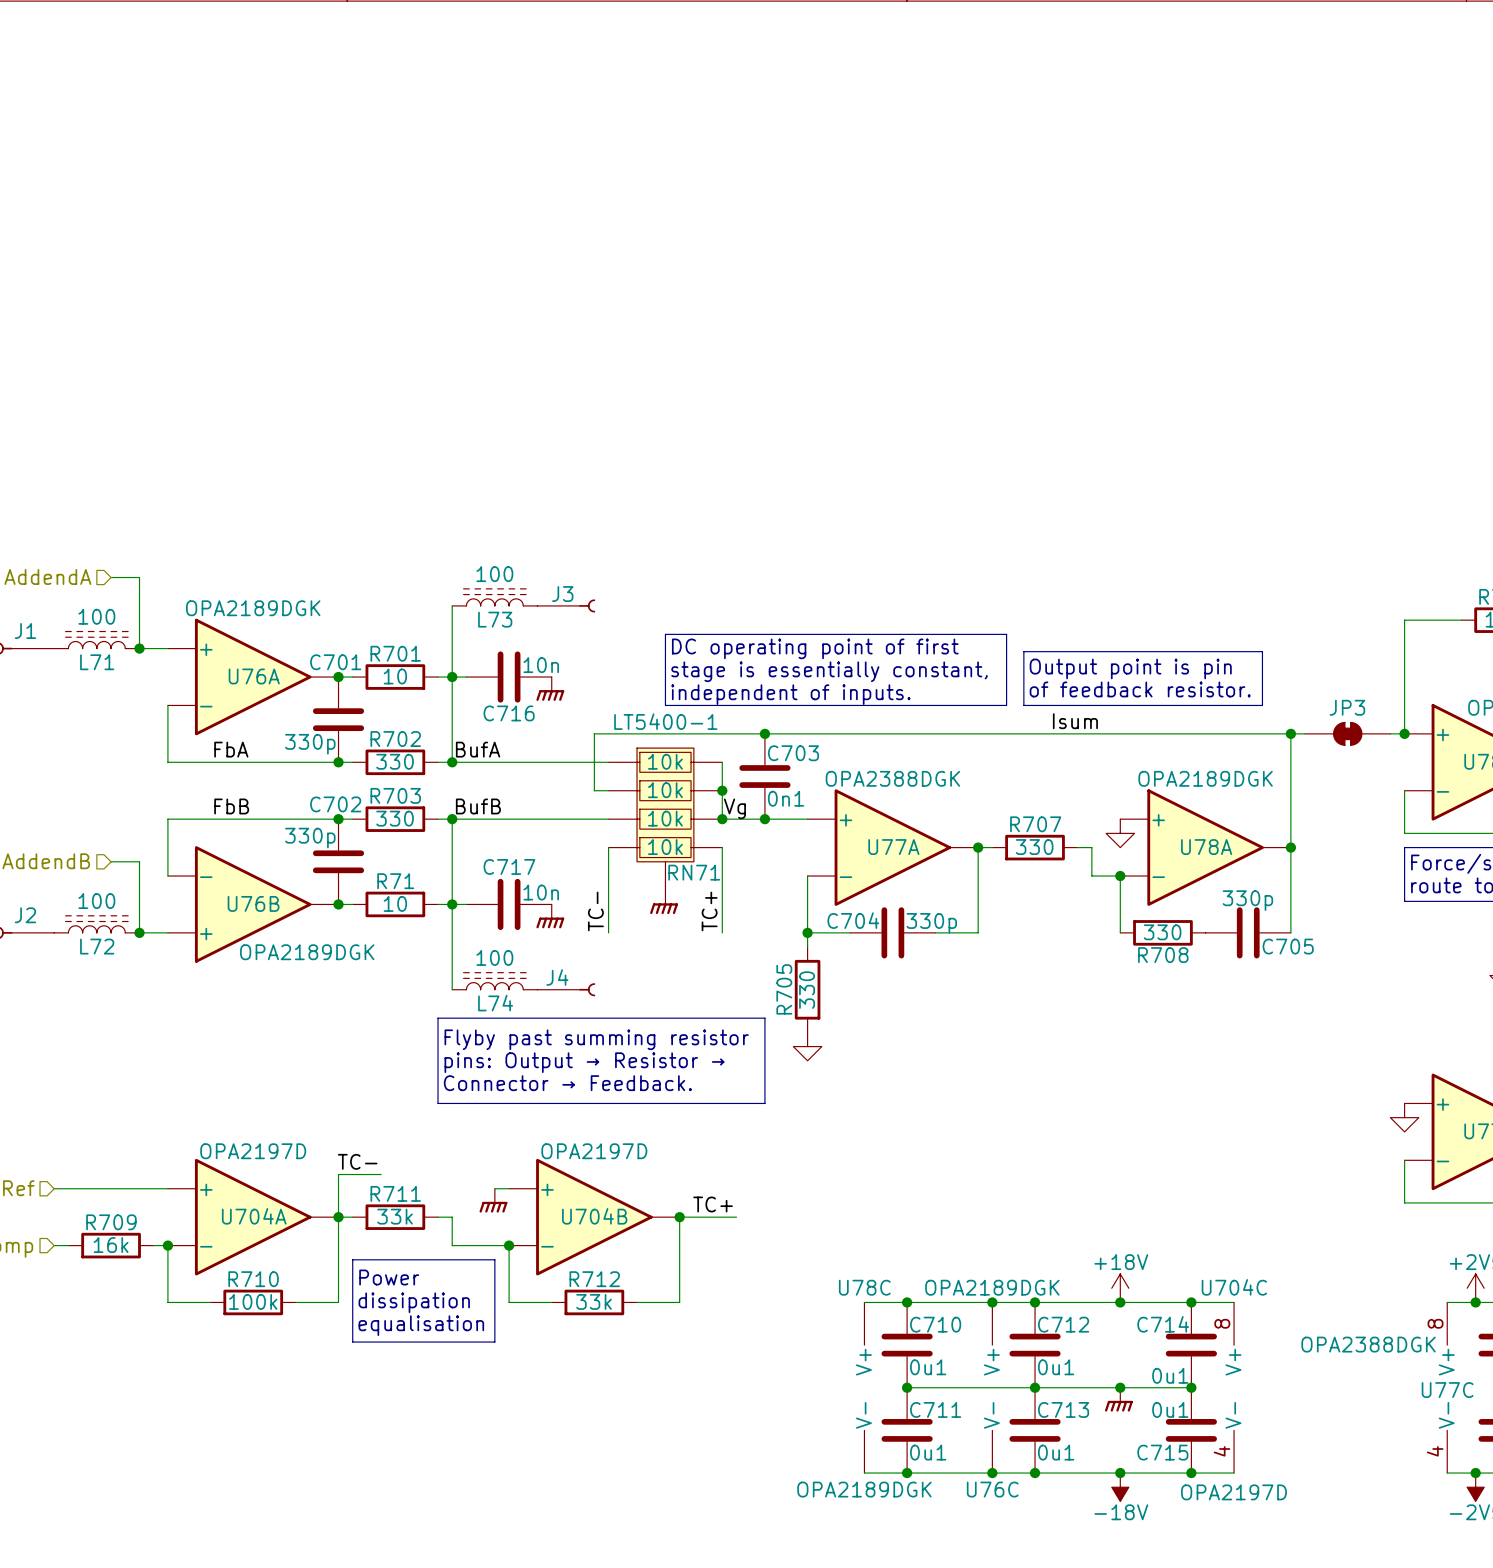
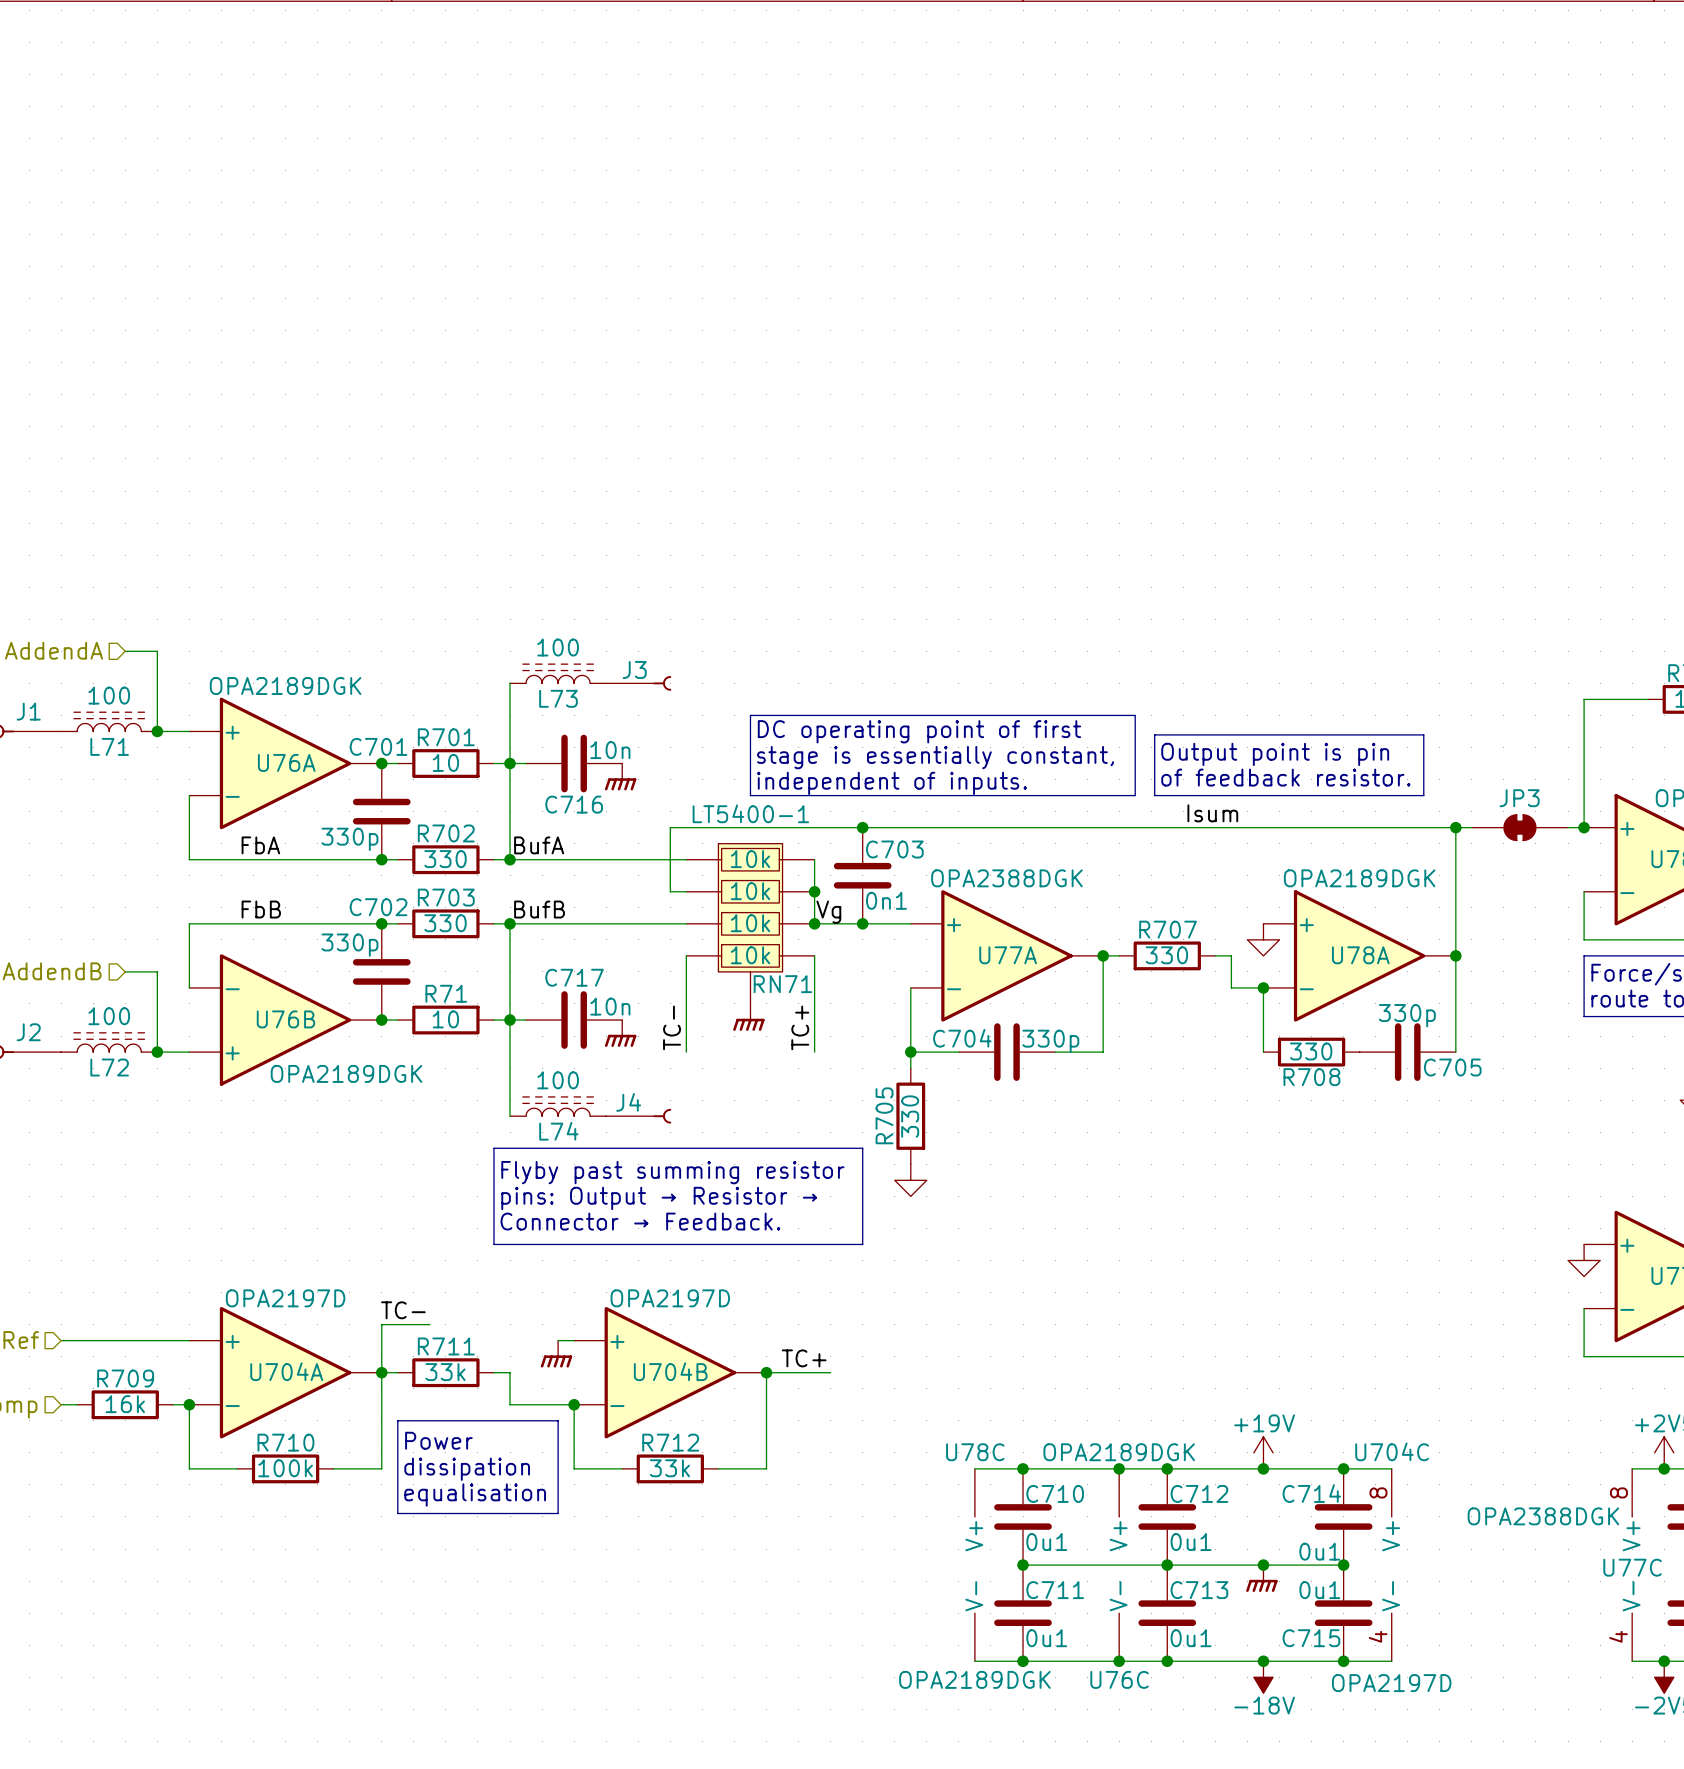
power symbol: +18V (1120, 1288) -> +19V (1263, 1452)

